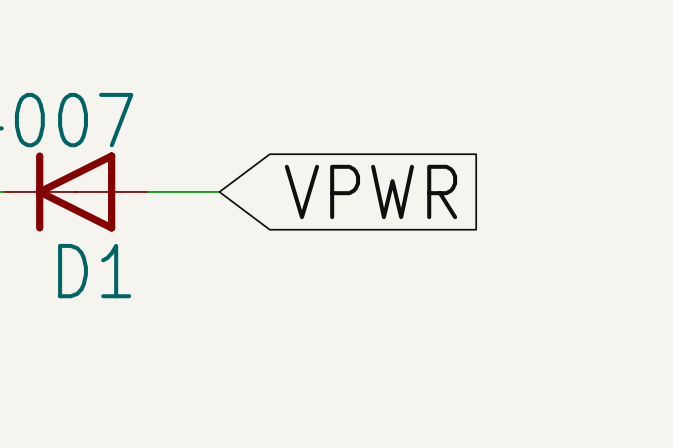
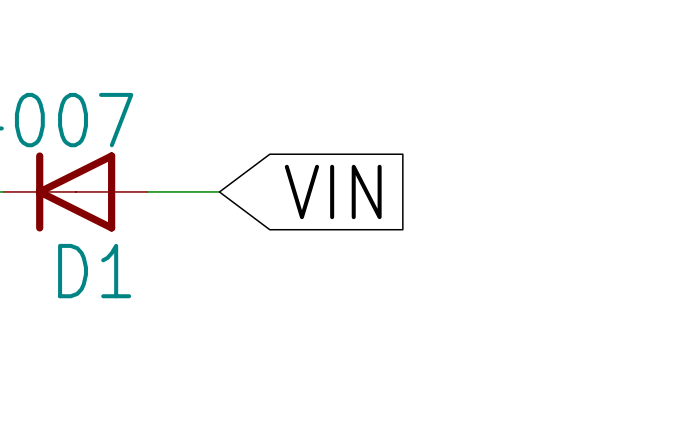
global label: VPWR (370, 191) -> VIN (333, 191)

